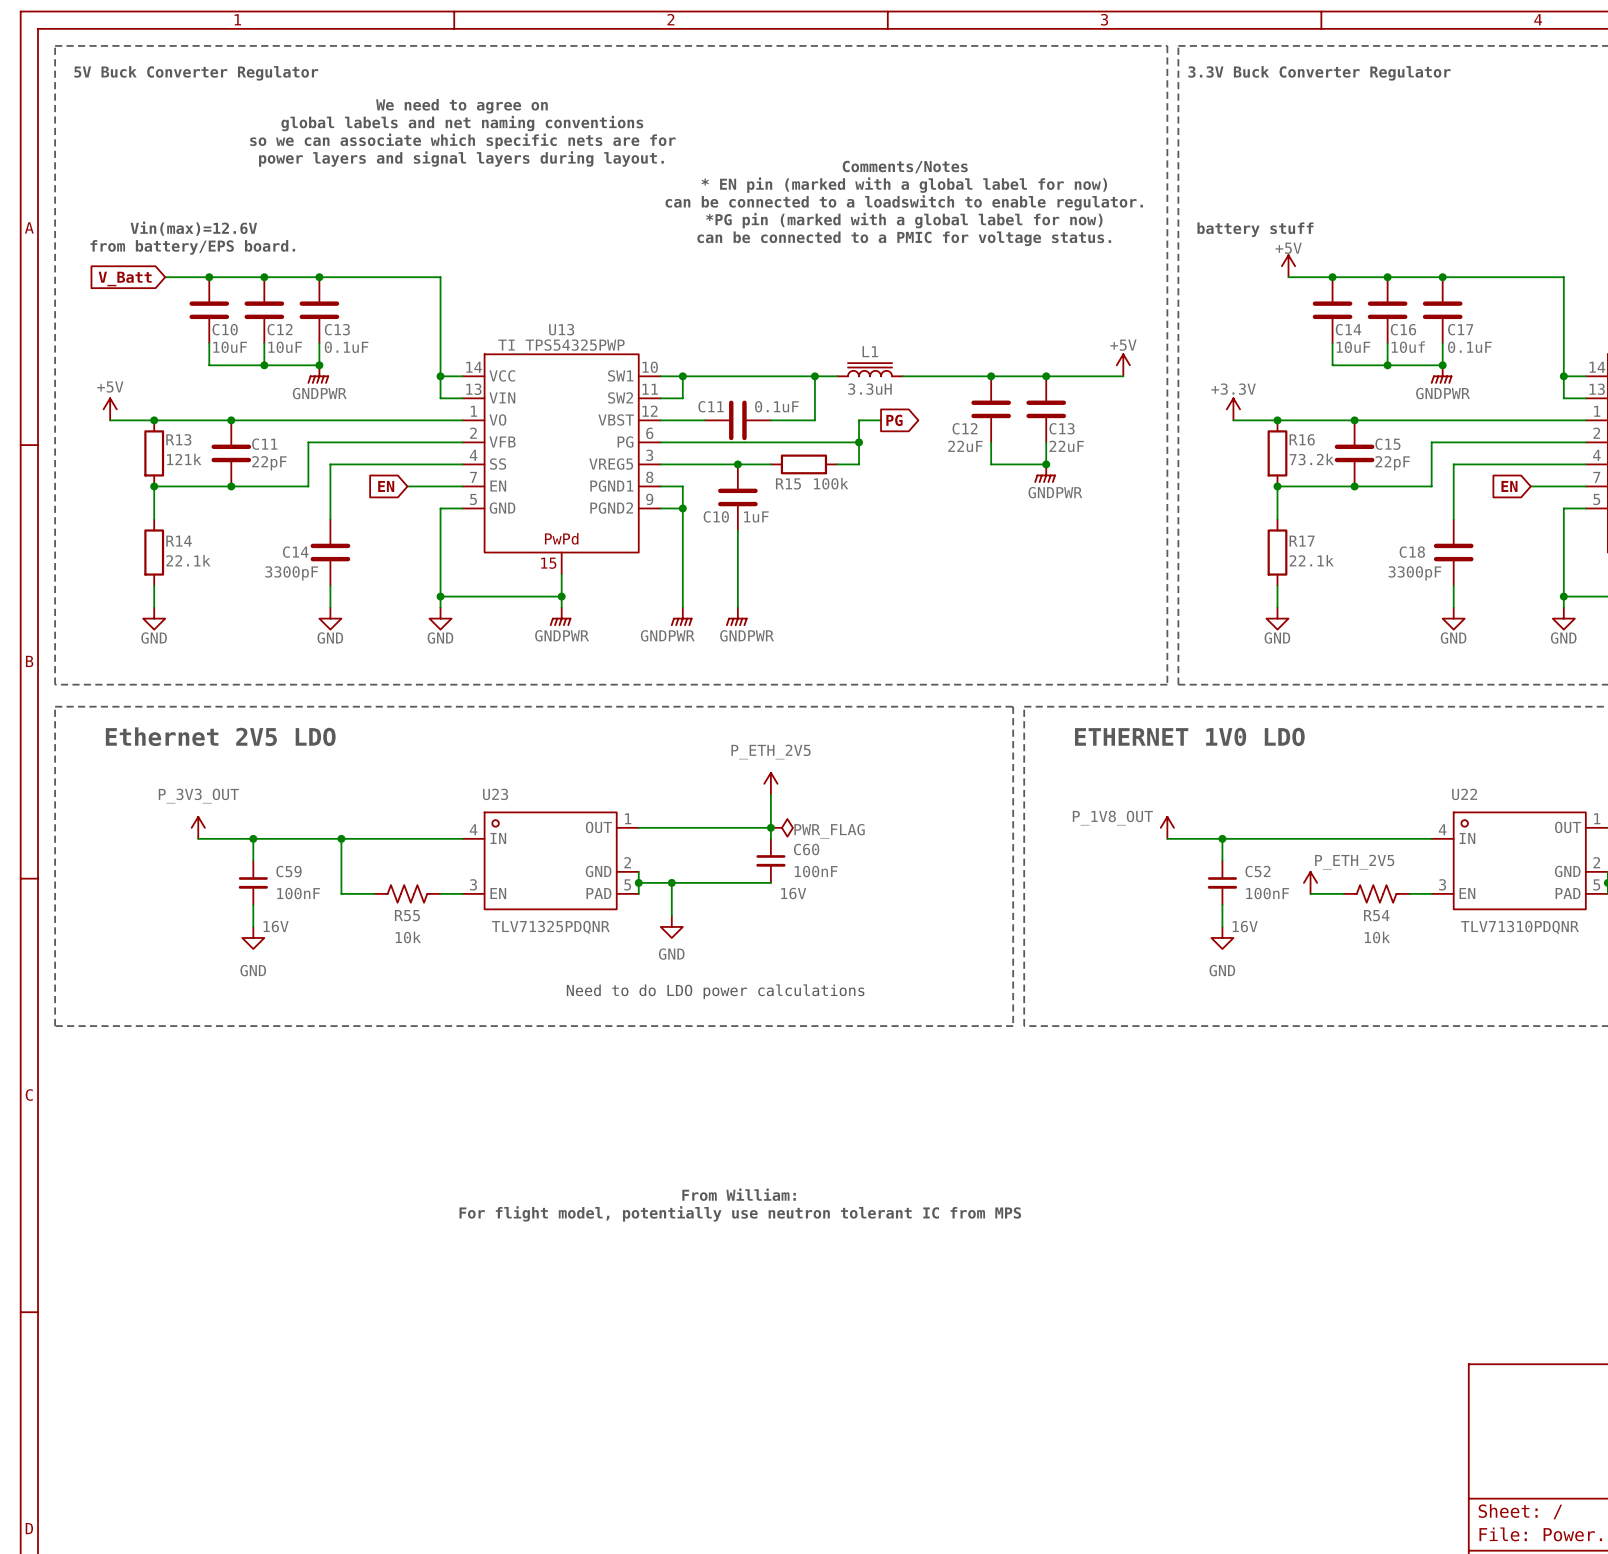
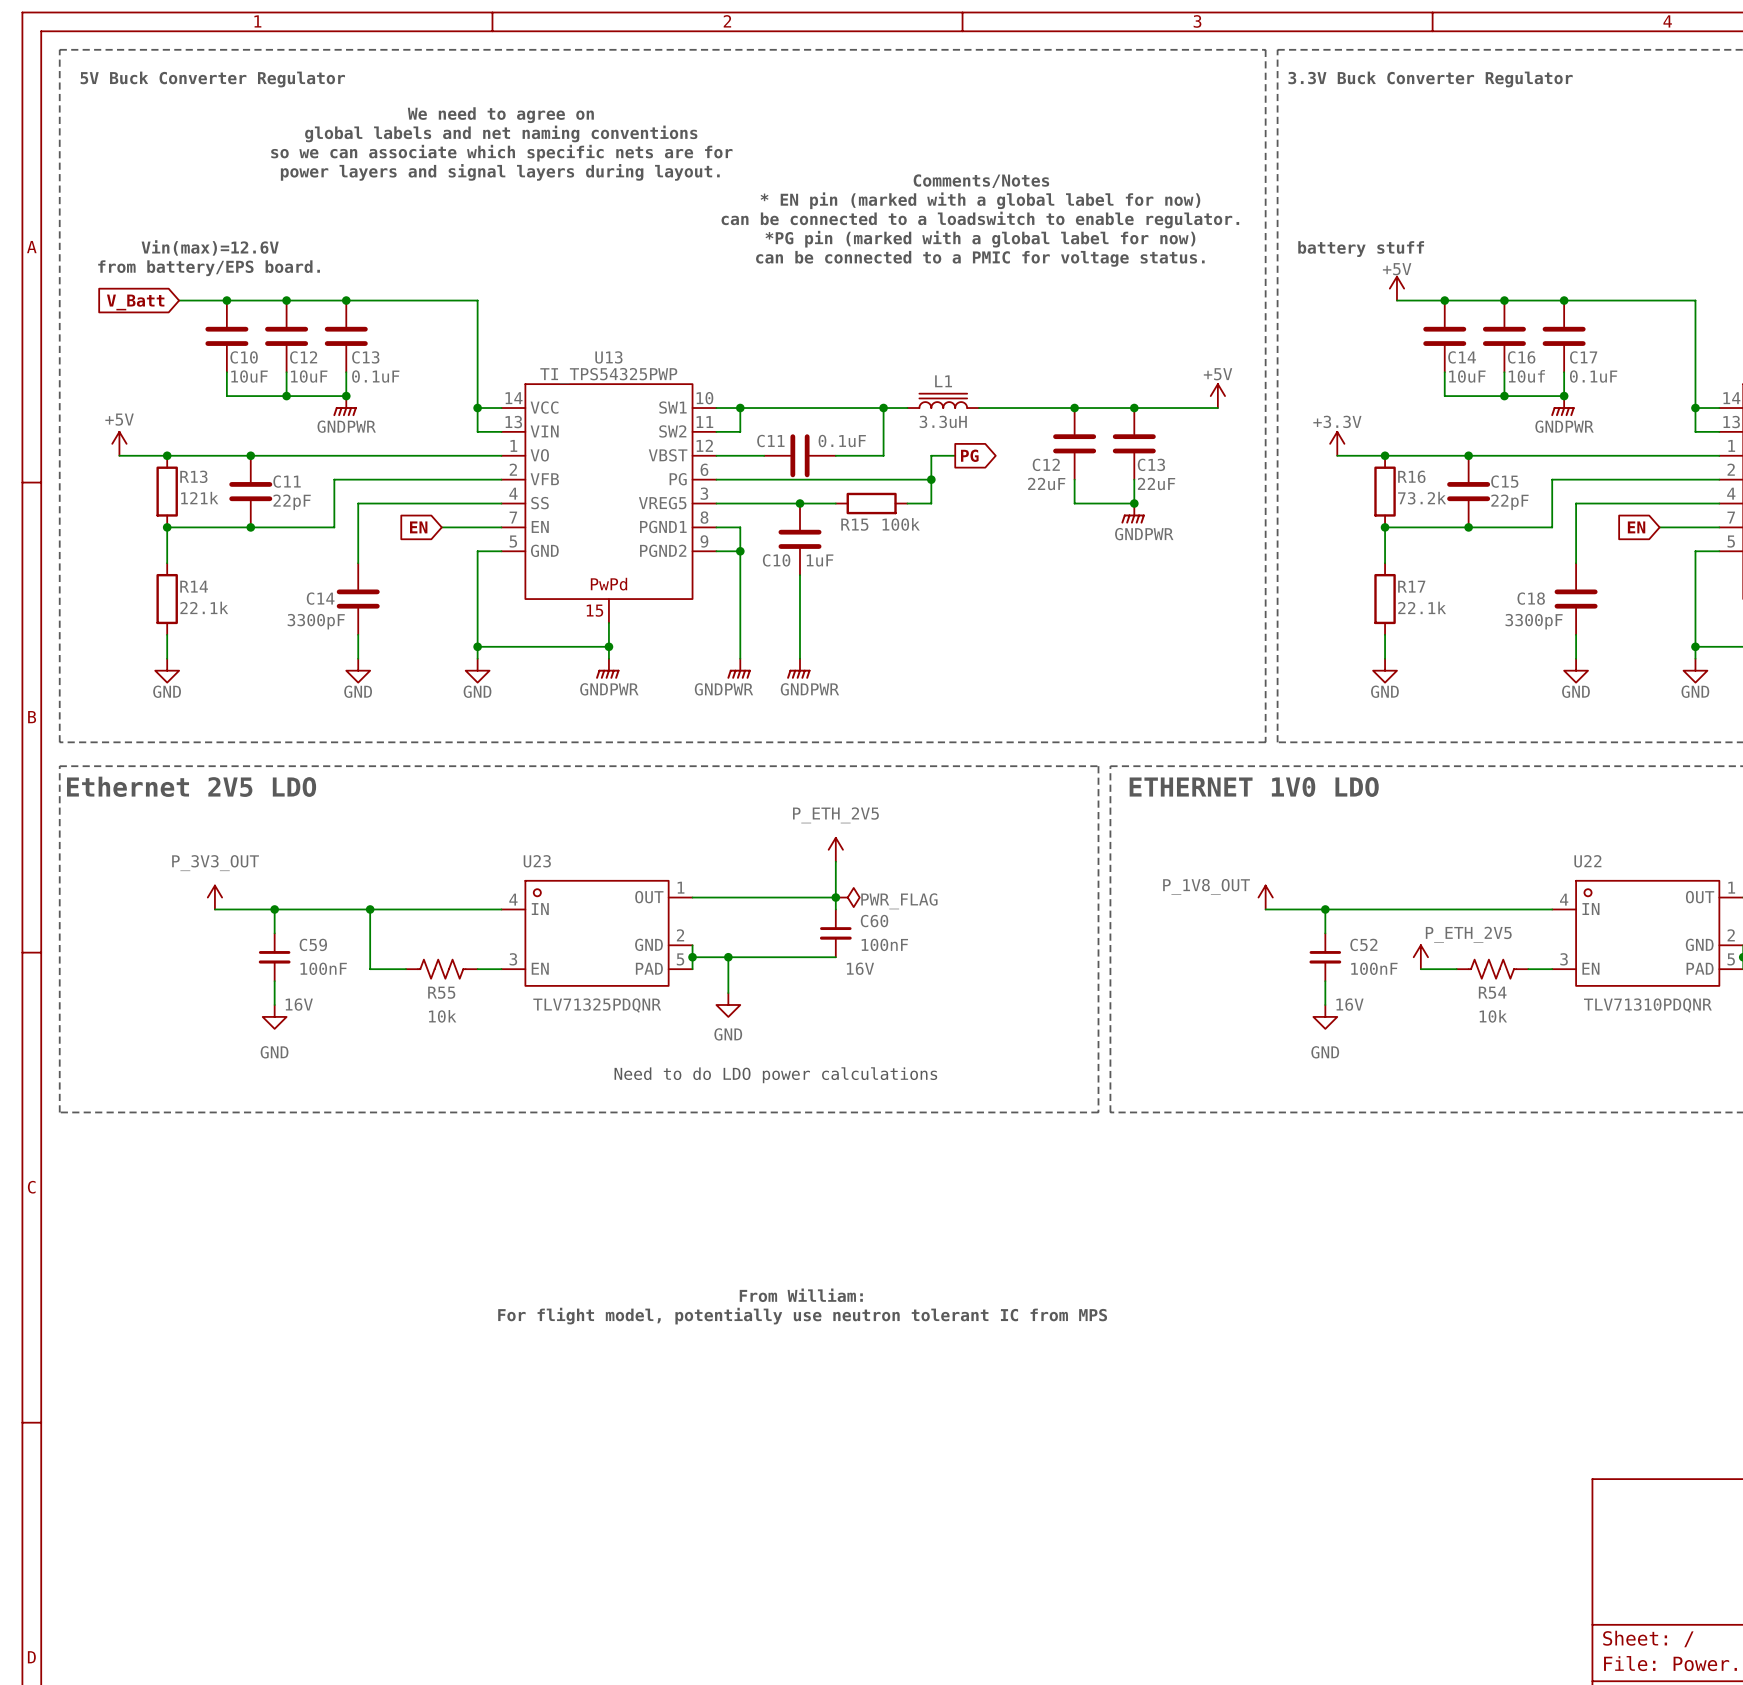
text position: Ethernet 2V5 LDO (220, 736) -> Ethernet 2V5 LDO (191, 786)
text position: ETHERNET 1V0 LDO (1189, 736) -> ETHERNET 1V0 LDO (1254, 787)

